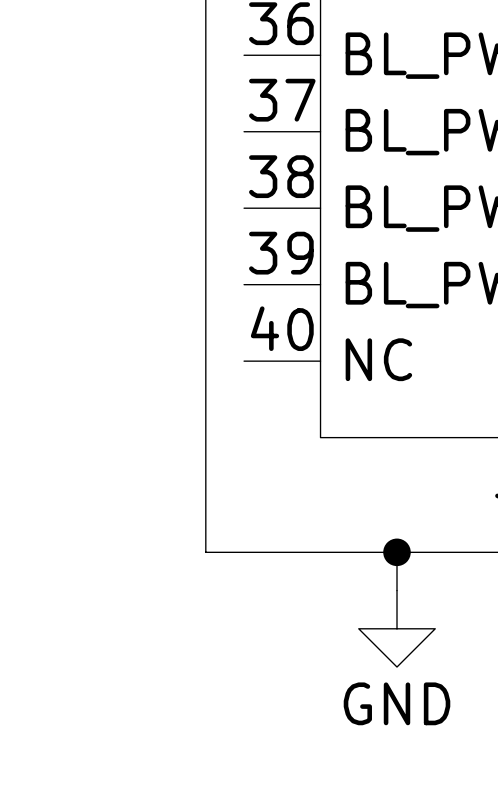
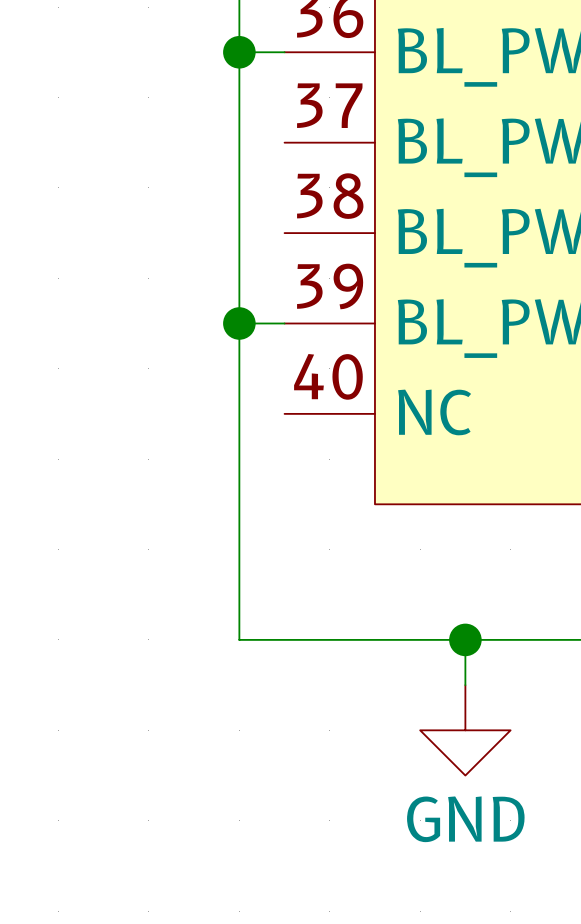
wire: none -> (239, 52) (284, 52)
junction: none -> (239, 52)
wire: none -> (239, 323) (284, 323)
junction: none -> (239, 323)

